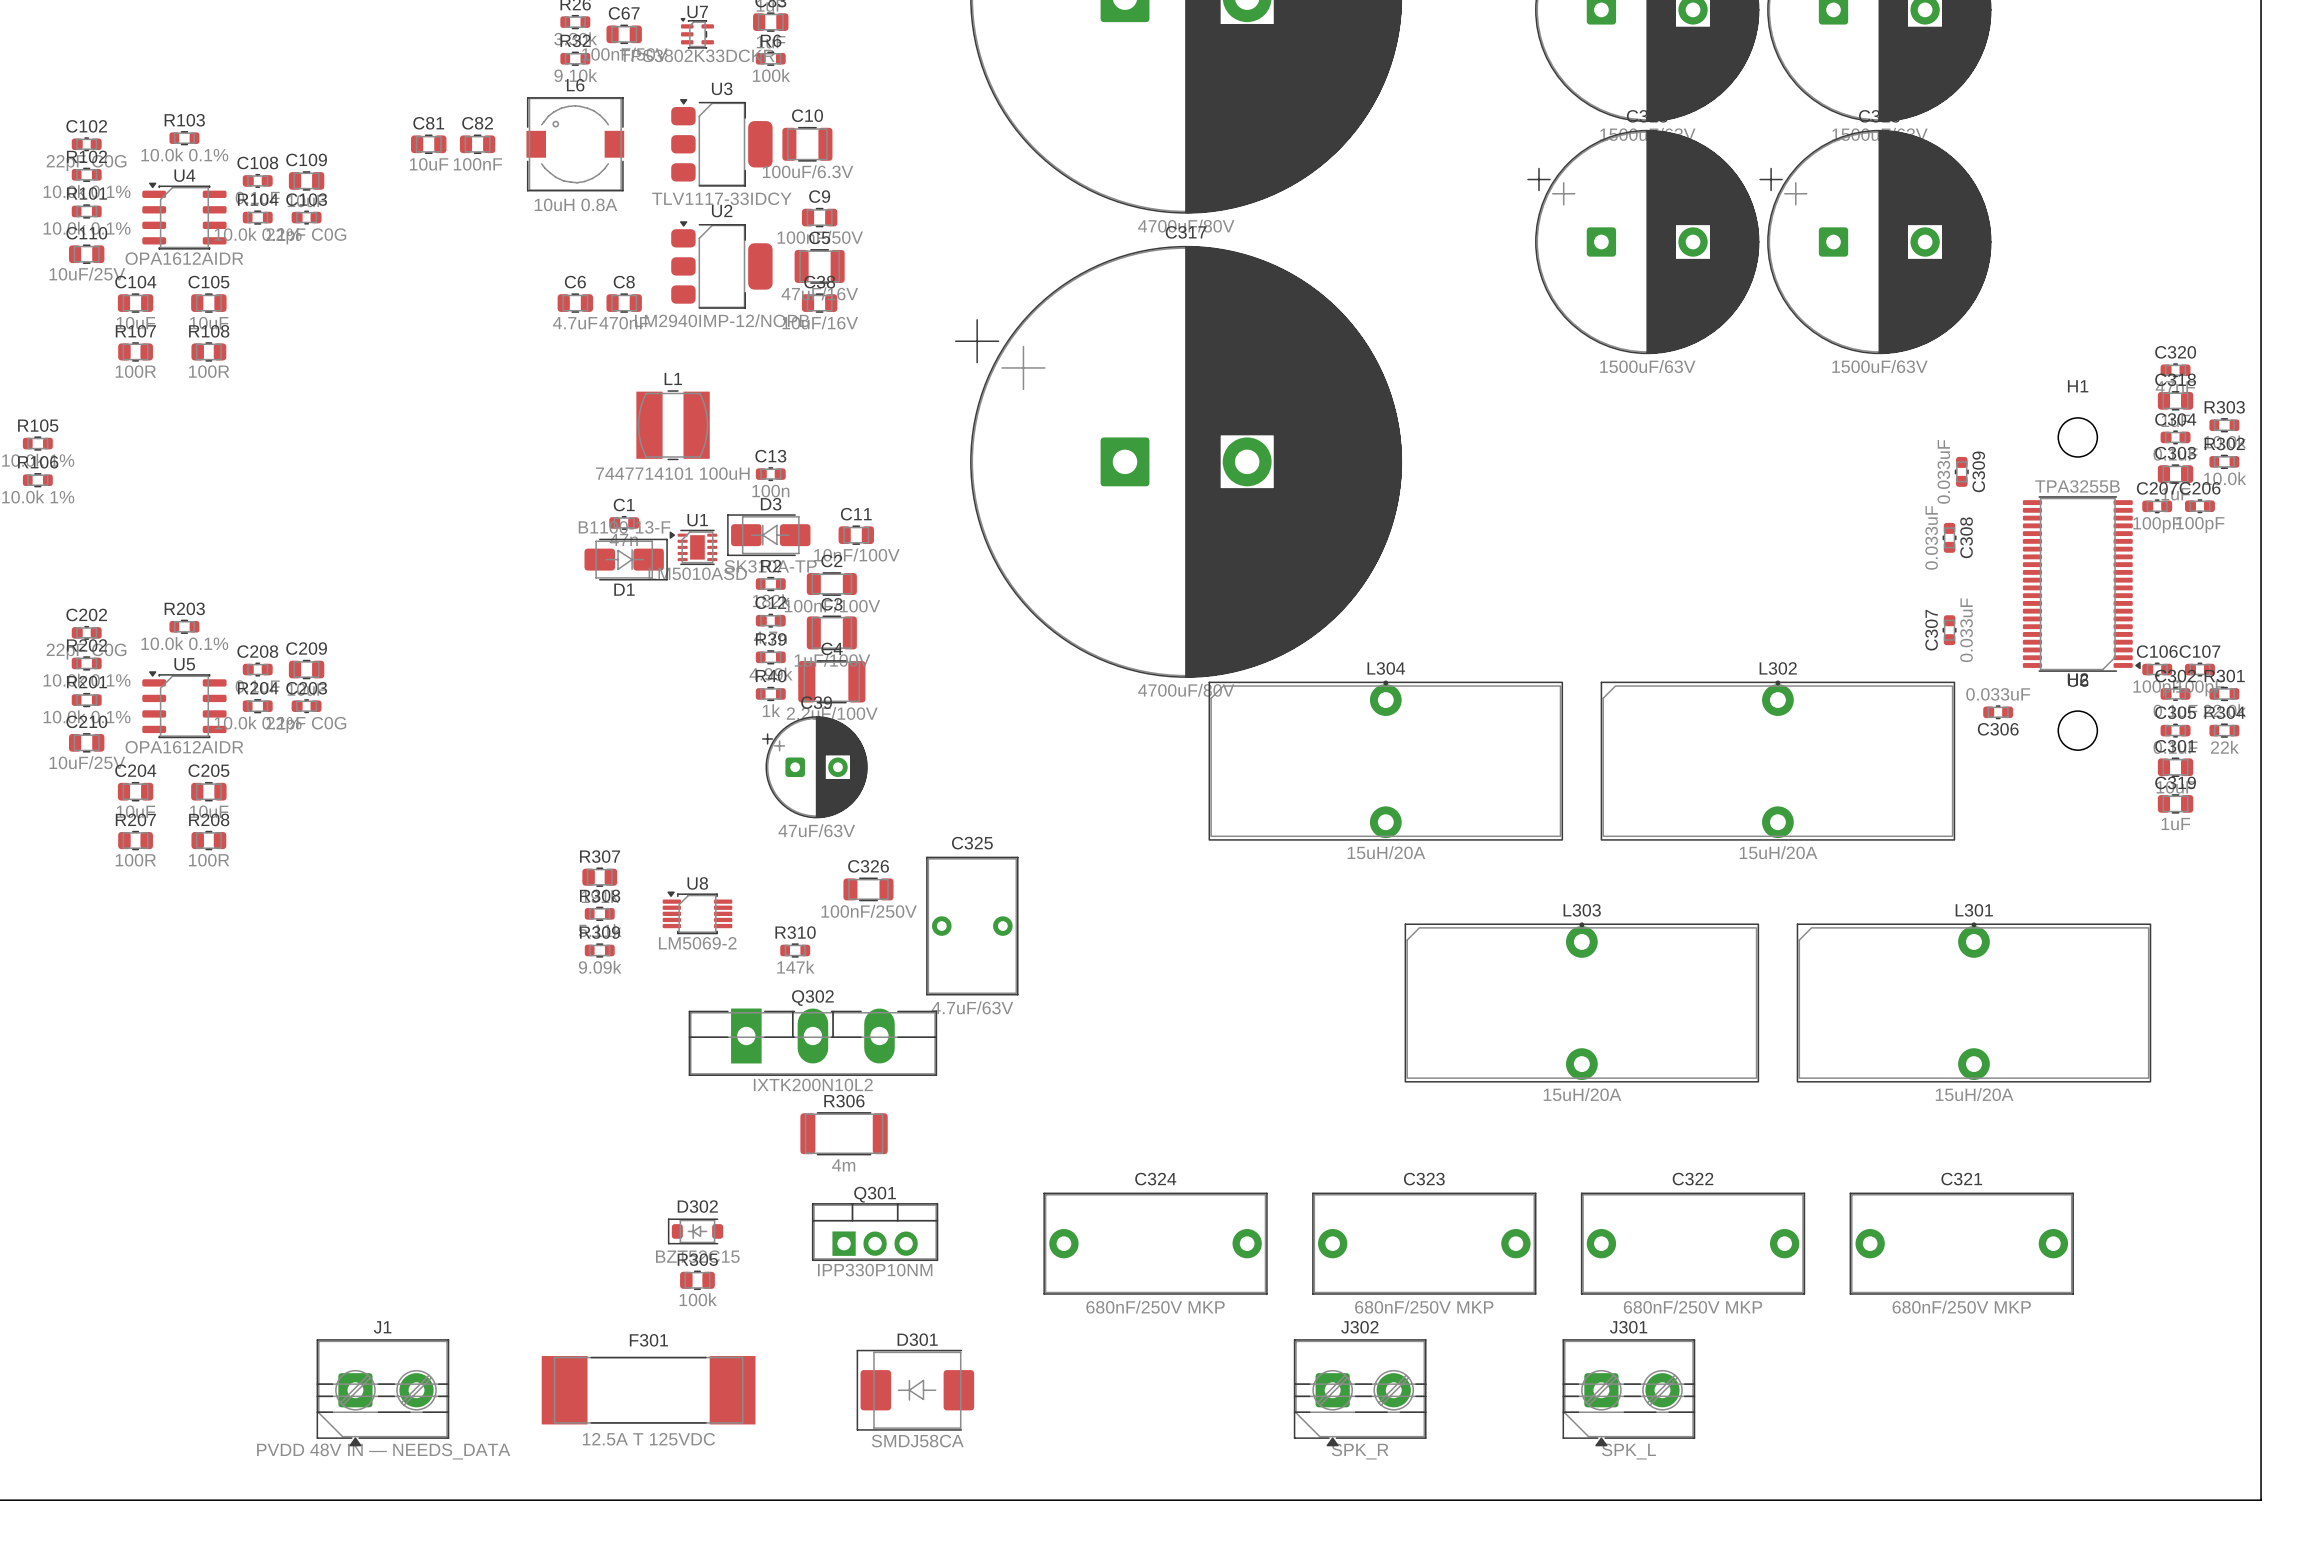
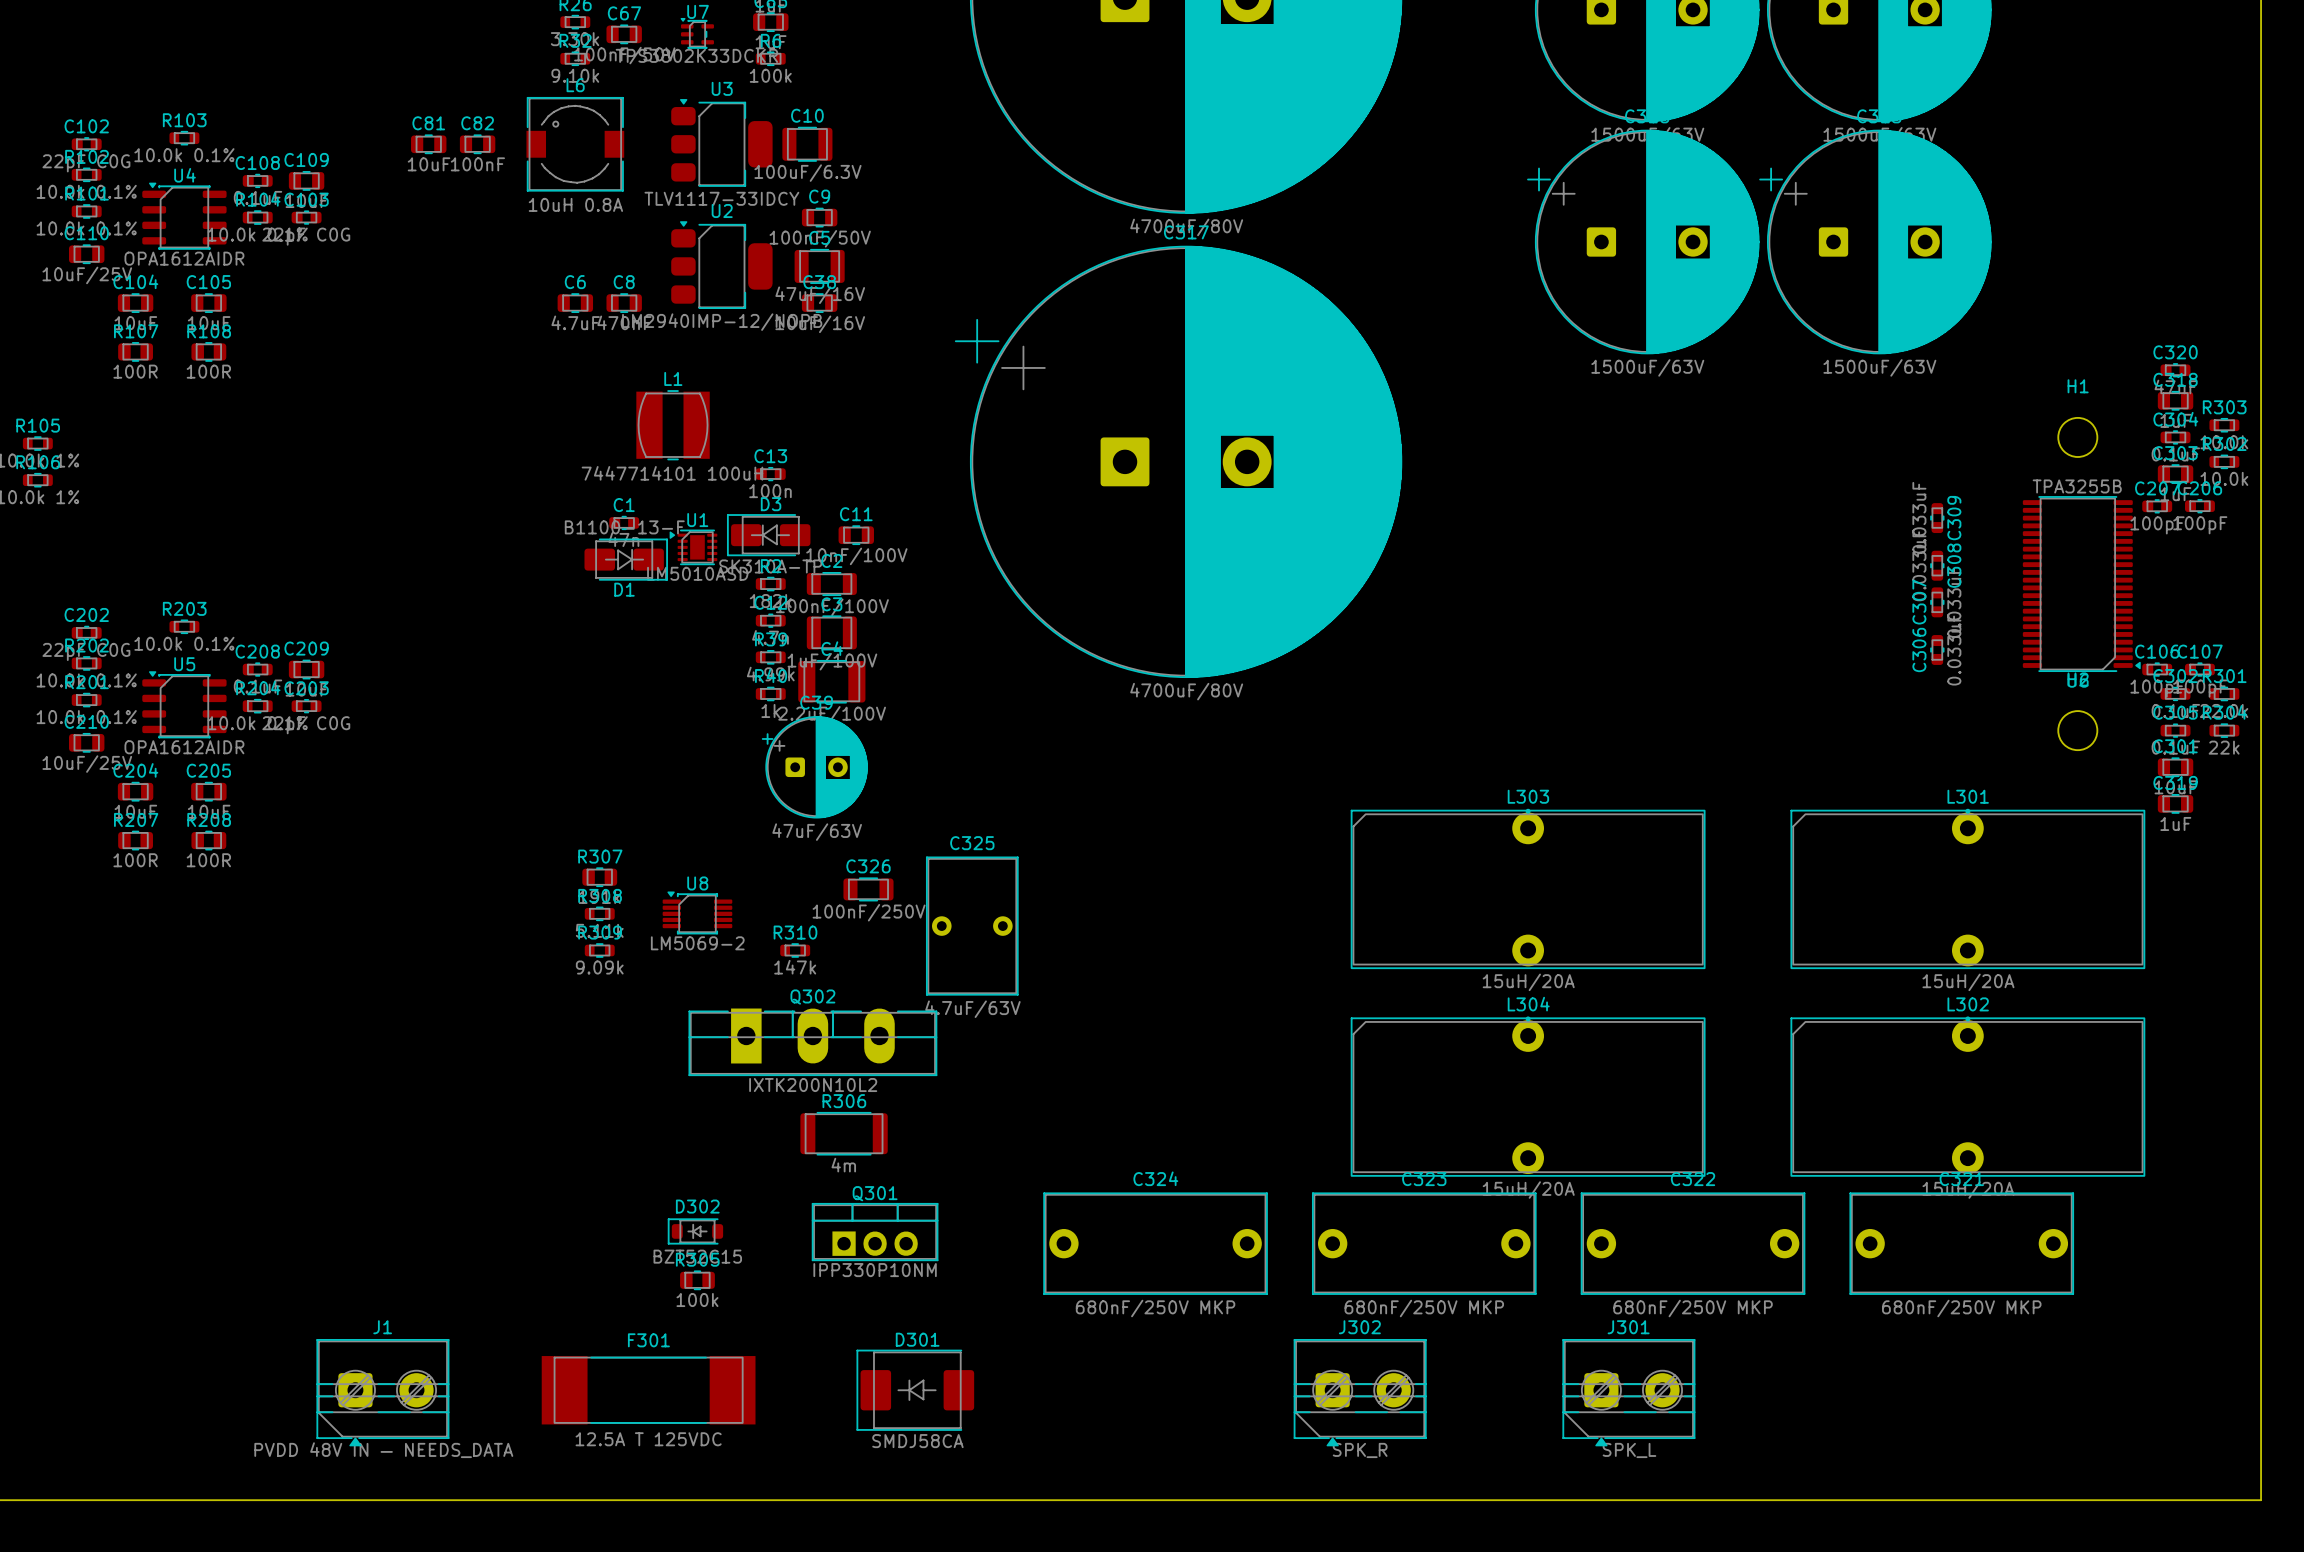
C309 position: (1961, 471) -> (1937, 518)
C308 position: (1949, 537) -> (1937, 565)
C307 position: (1949, 630) -> (1937, 602)
C306 rotation: 0° (1998, 712) -> 90° clockwise (1937, 649)
C306 position: (1998, 712) -> (1937, 649)
L304 position: (1385, 760) -> (1528, 1096)
L302 position: (1777, 760) -> (1967, 1096)
L303 position: (1581, 1002) -> (1528, 888)
L301 position: (1973, 1002) -> (1967, 888)

